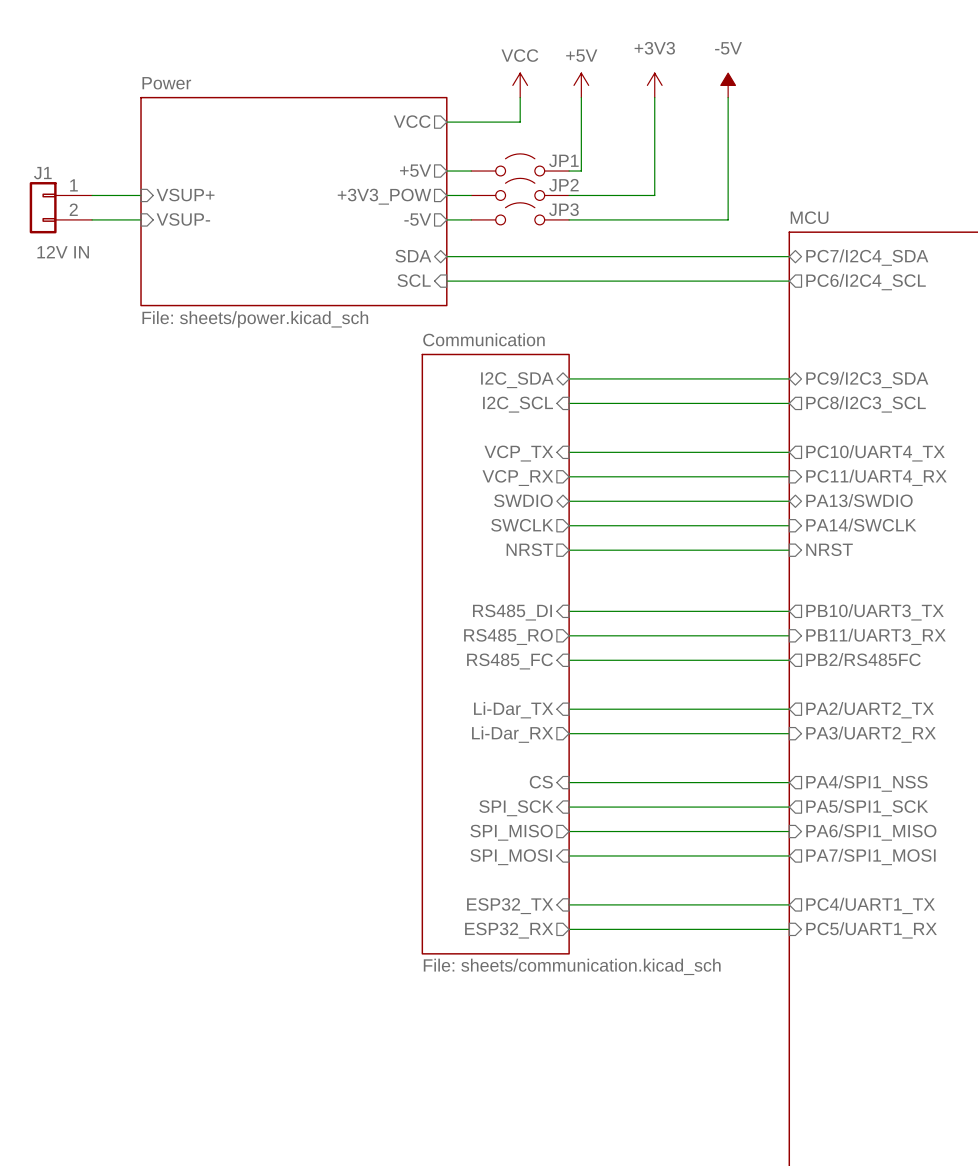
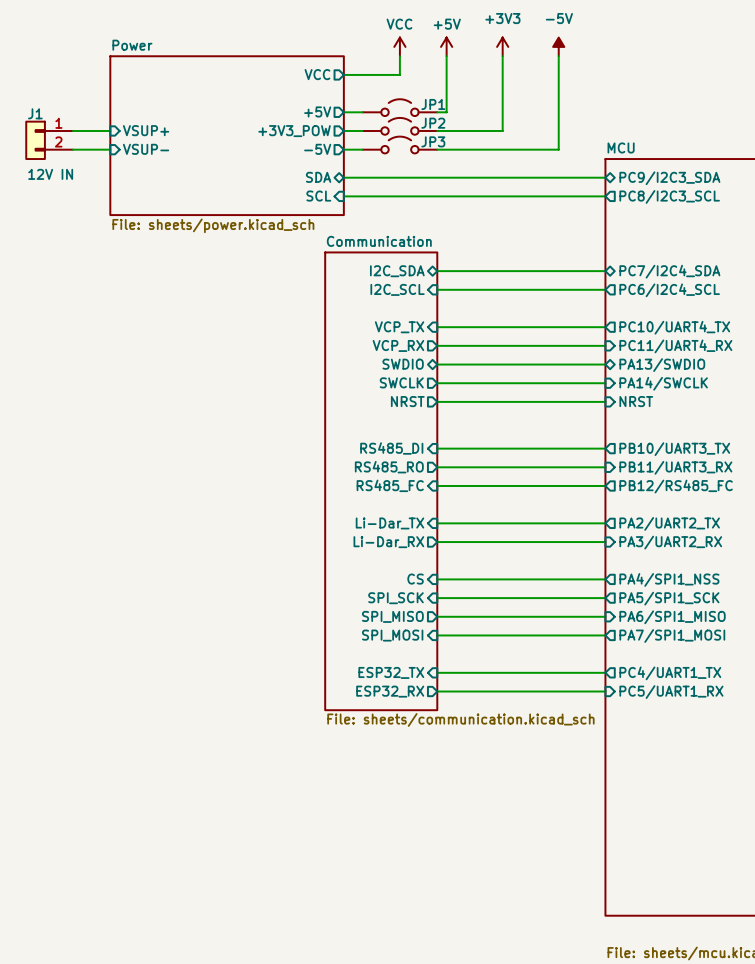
sheet pin: PC7/I2C4_SDA (867, 257) -> PC9/I2C3_SDA (669, 178)
sheet pin: PC6/I2C4_SCL (866, 282) -> PC8/I2C3_SCL (669, 196)
sheet pin: PC9/I2C3_SDA (867, 379) -> PC7/I2C4_SDA (669, 271)
sheet pin: PC8/I2C3_SCL (866, 404) -> PC6/I2C4_SCL (669, 290)
sheet pin: PB2/RS485FC (863, 659) -> PB12/RS485_FC (676, 486)

